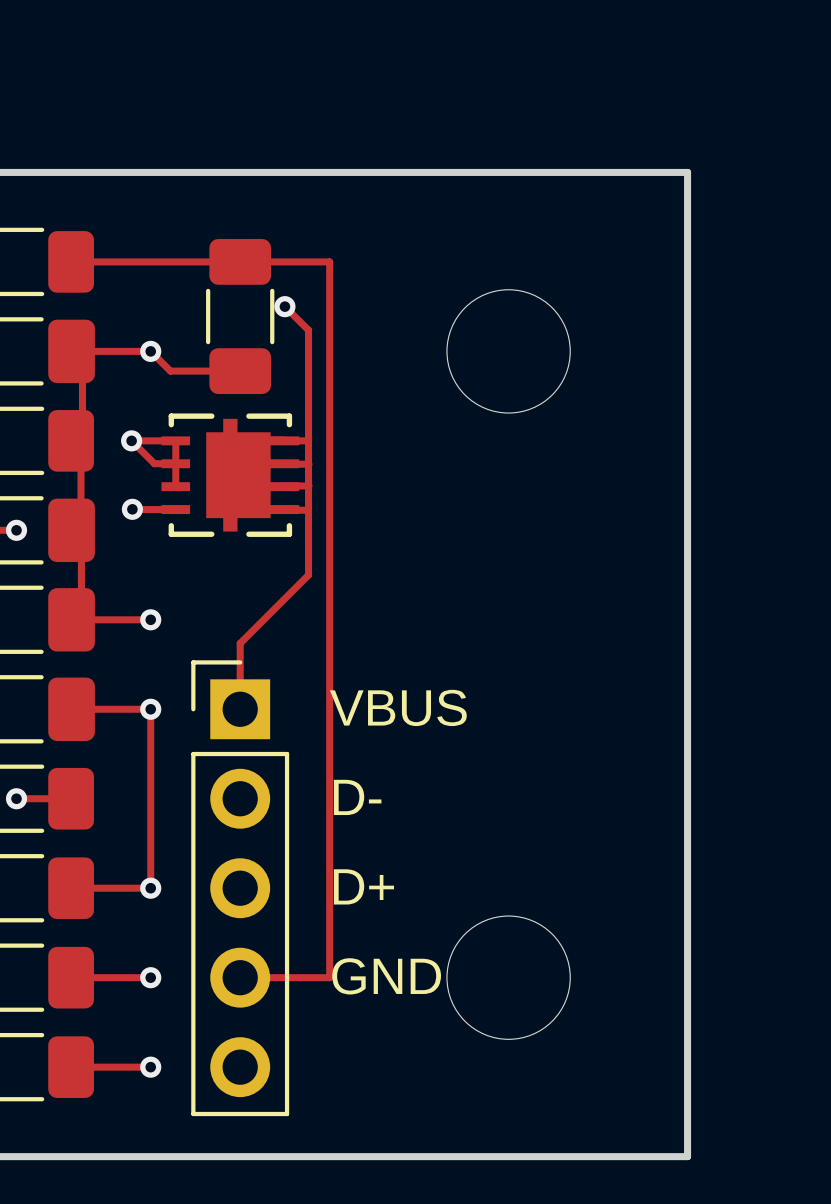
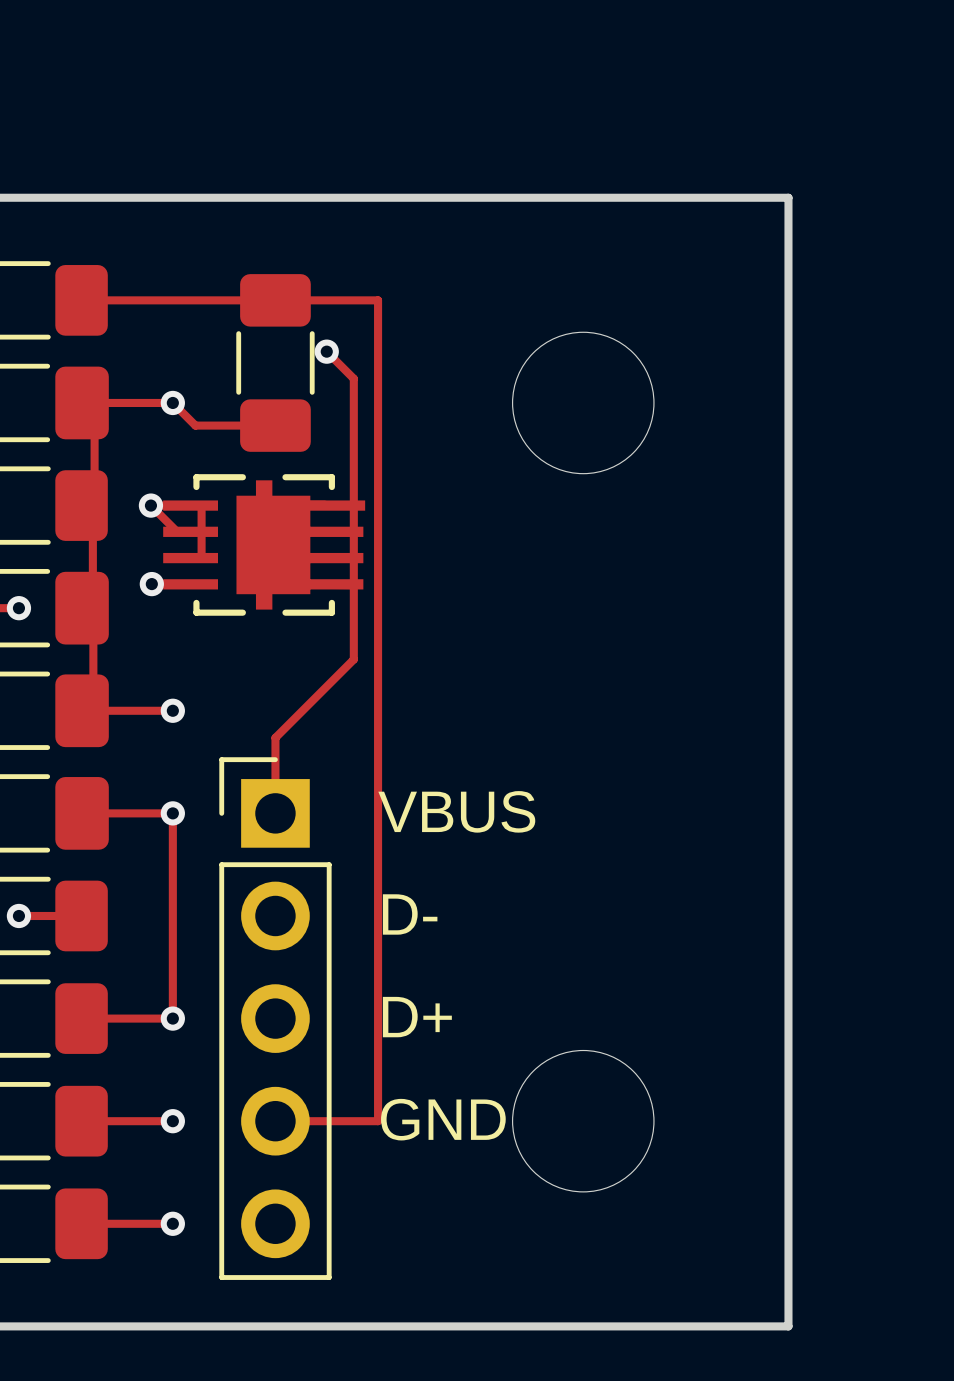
part footprint: [161, 413, 300, 537] -> [163, 474, 366, 616]

